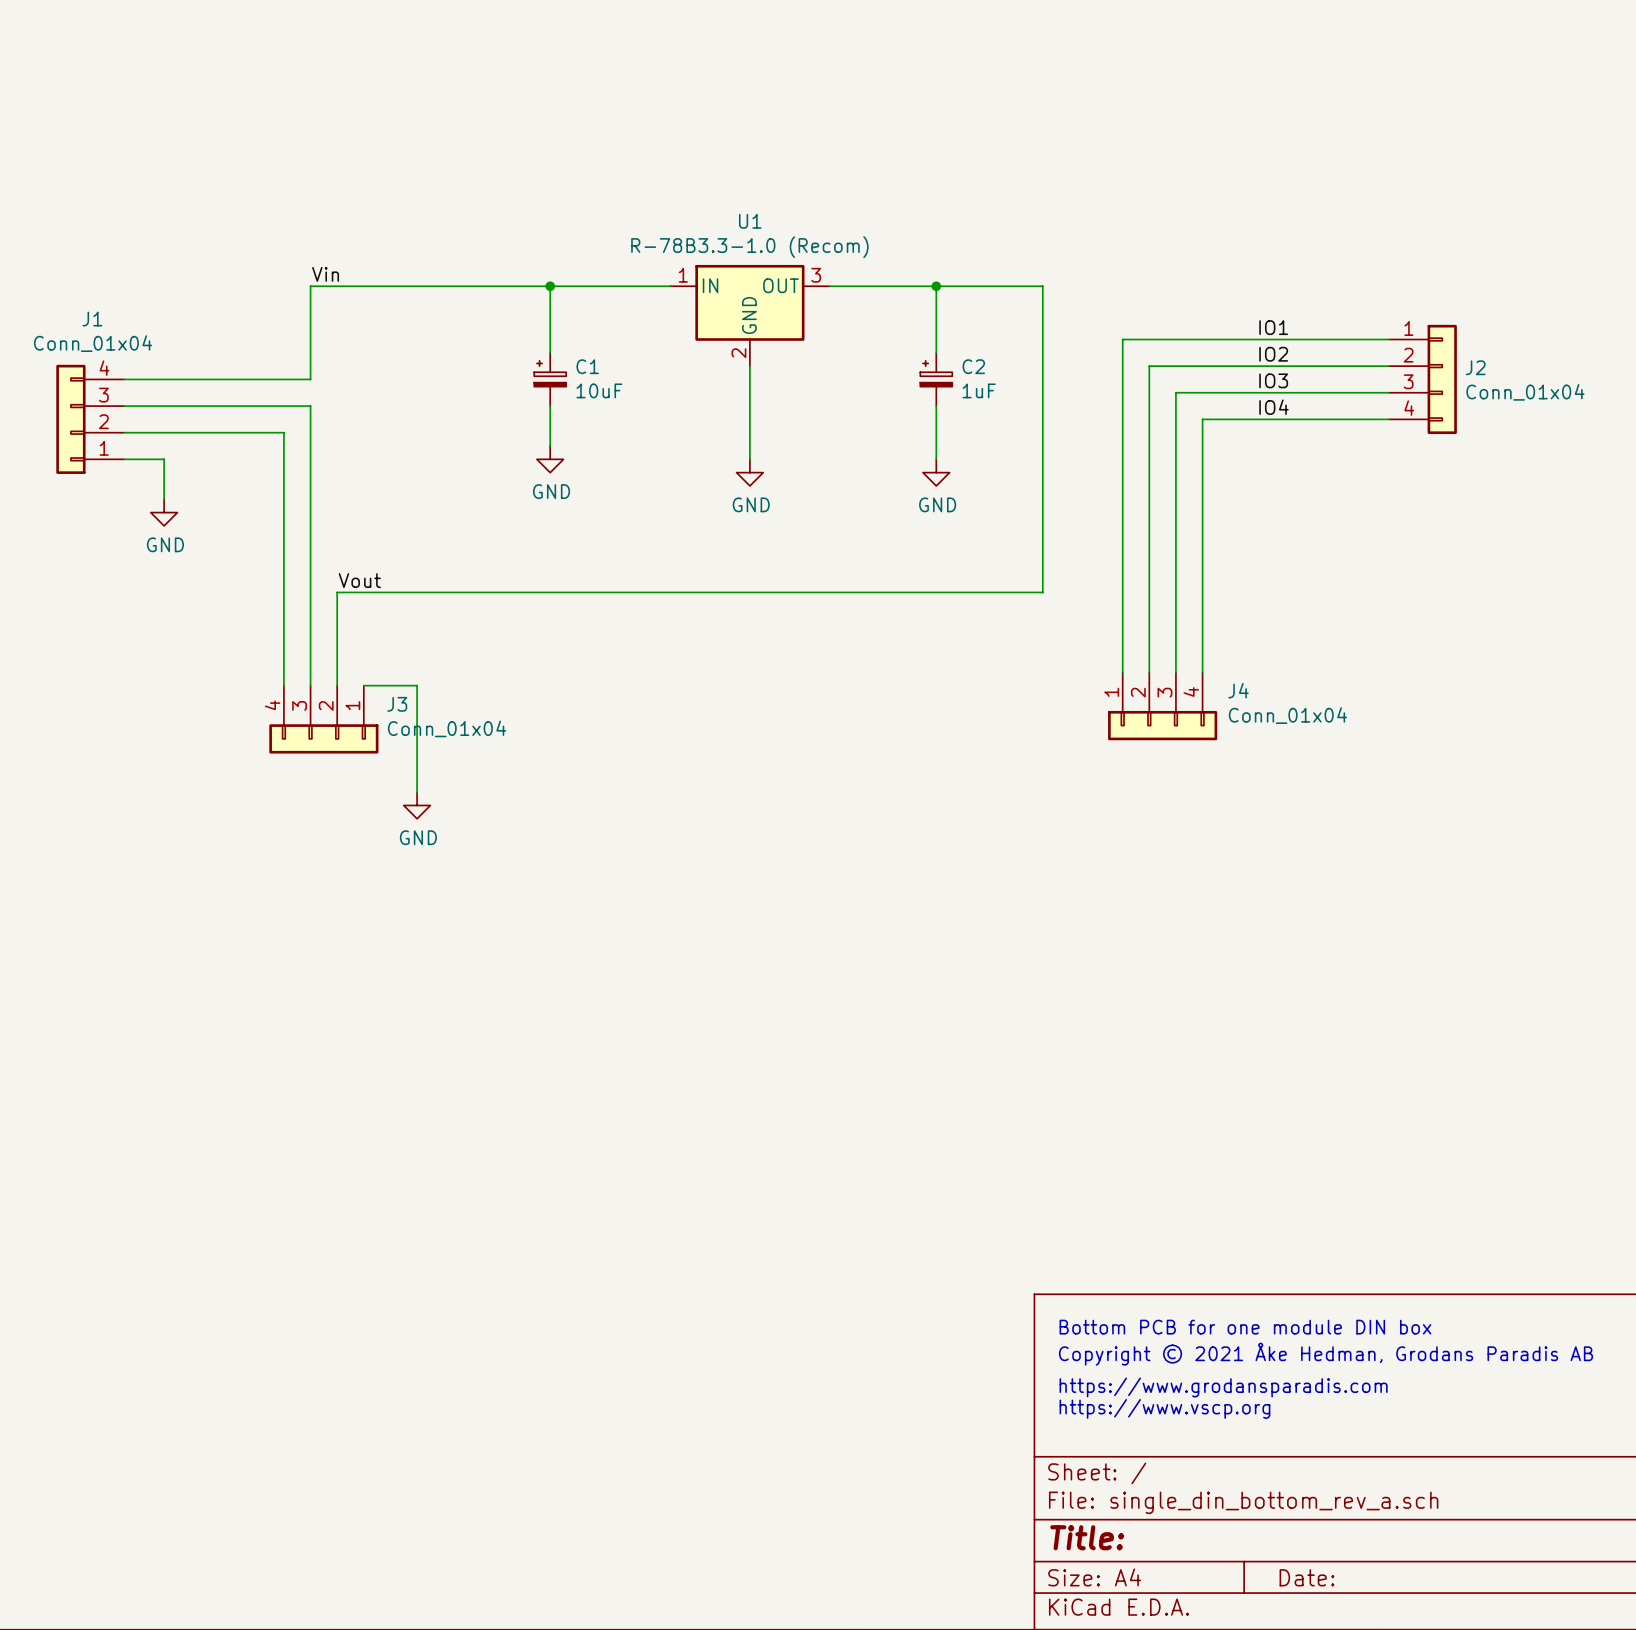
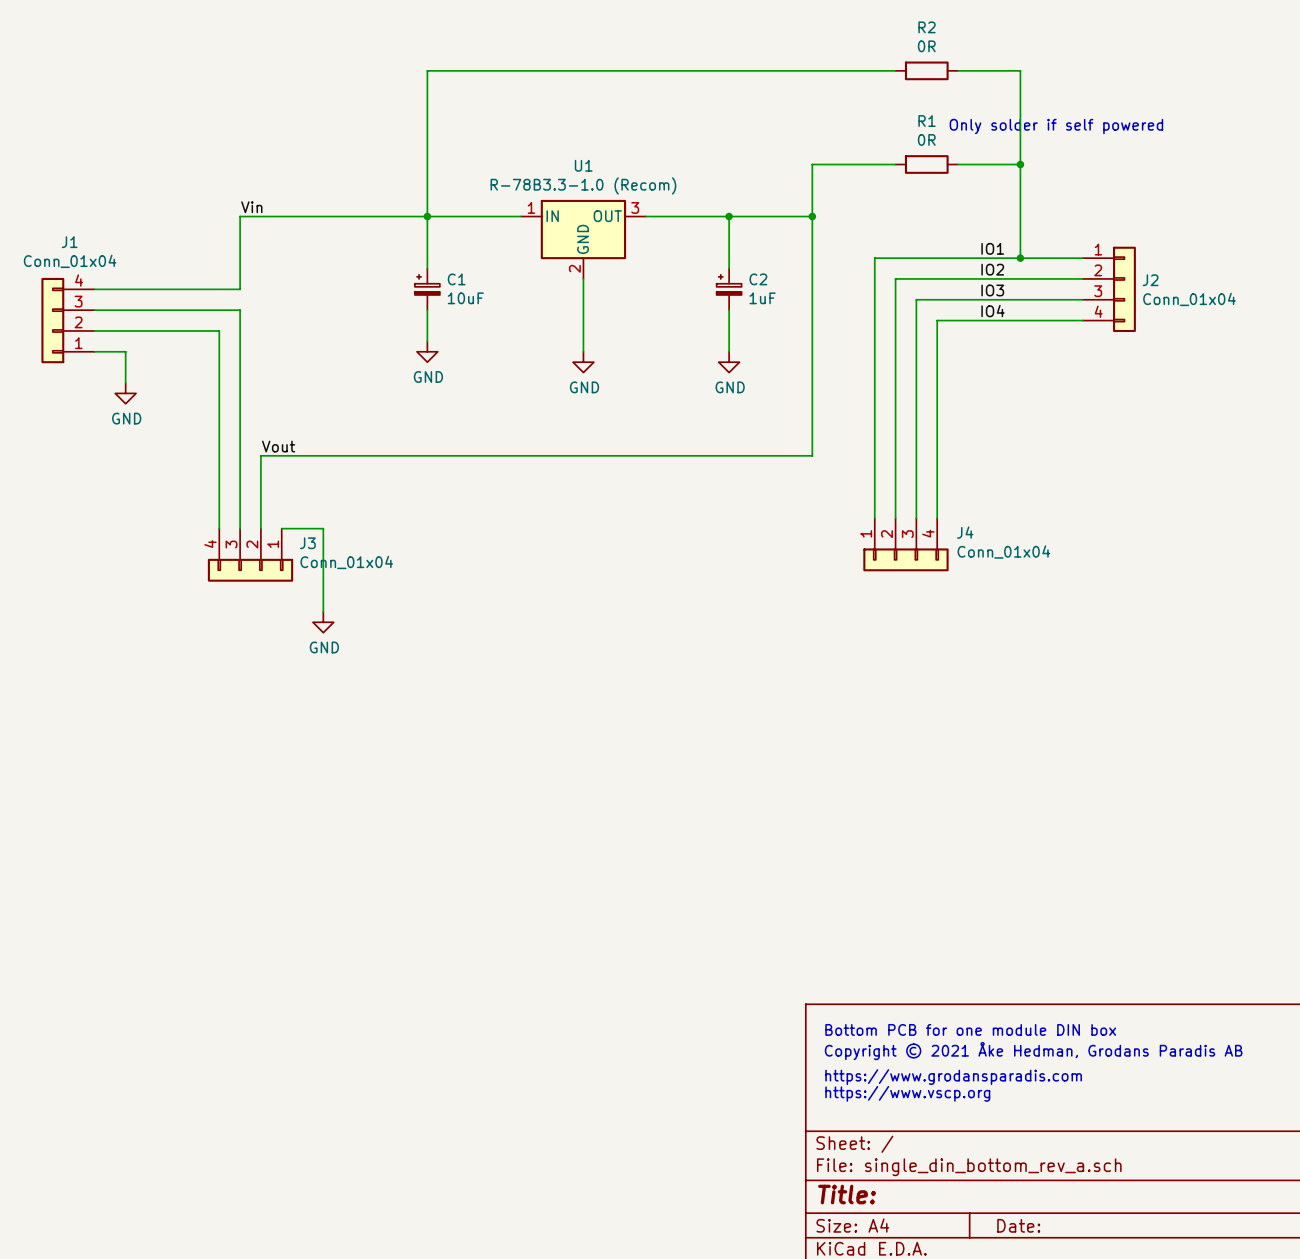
wire: none -> (895, 70) (427, 70) (427, 216)
R2: none -> 0R (926, 70)
wire: none -> (957, 70) (1020, 70) (1020, 258)
text: none -> Only solder if self powered (1056, 126)
wire: none -> (895, 164) (812, 164) (812, 216)
R1: none -> 0R (926, 164)
wire: none -> (957, 164) (1020, 164)
junction: none -> (1020, 164)
junction: none -> (812, 216)
junction: none -> (1020, 258)

